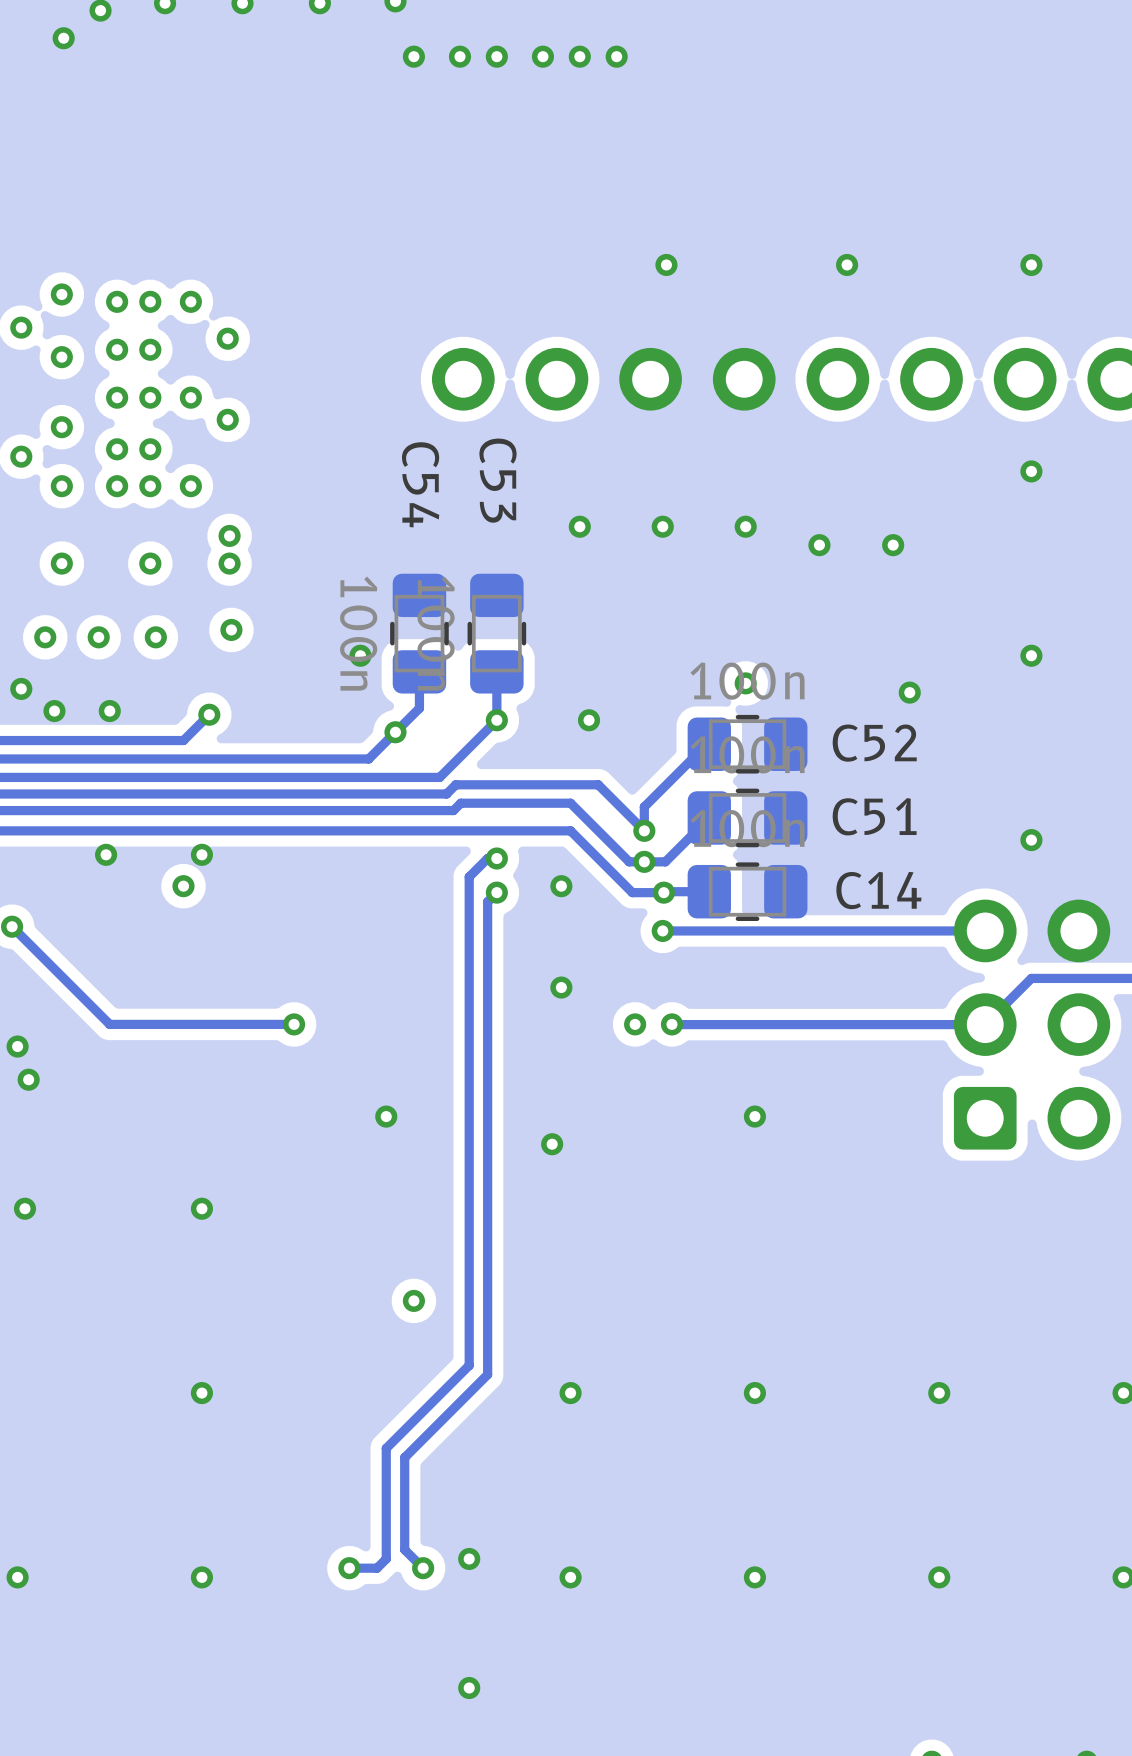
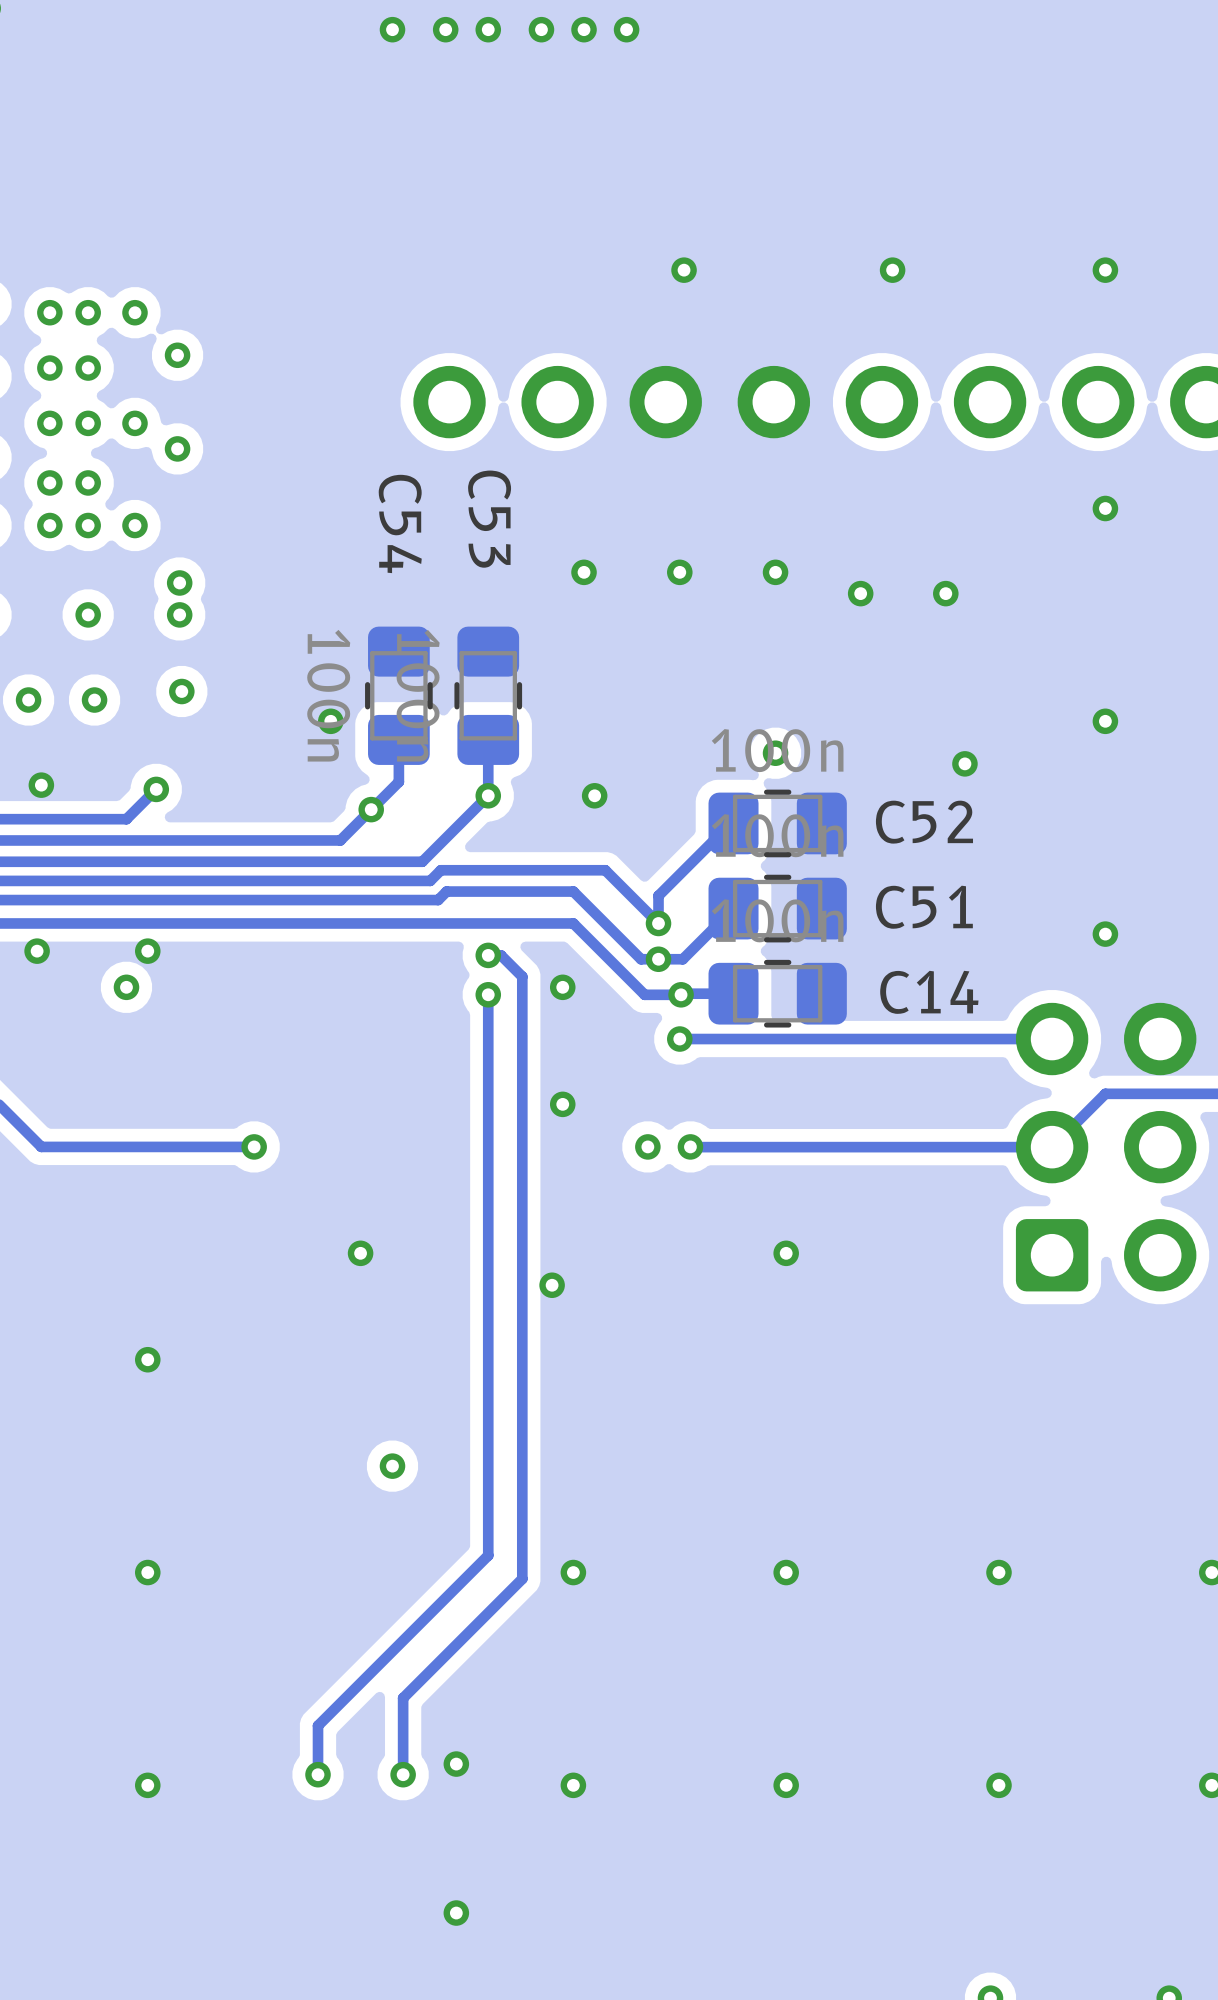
track: (496, 858) (487, 858) (469, 876) (469, 1365) (386, 1448) (386, 1558) (377, 1568) (349, 1568) -> (488, 994) (488, 1555) (318, 1725) (318, 1774)
track: (496, 892) (487, 901) (487, 1374) (404, 1457) (404, 1549) (423, 1568) -> (488, 955) (501, 955) (522, 976) (522, 1578) (403, 1698) (403, 1774)

